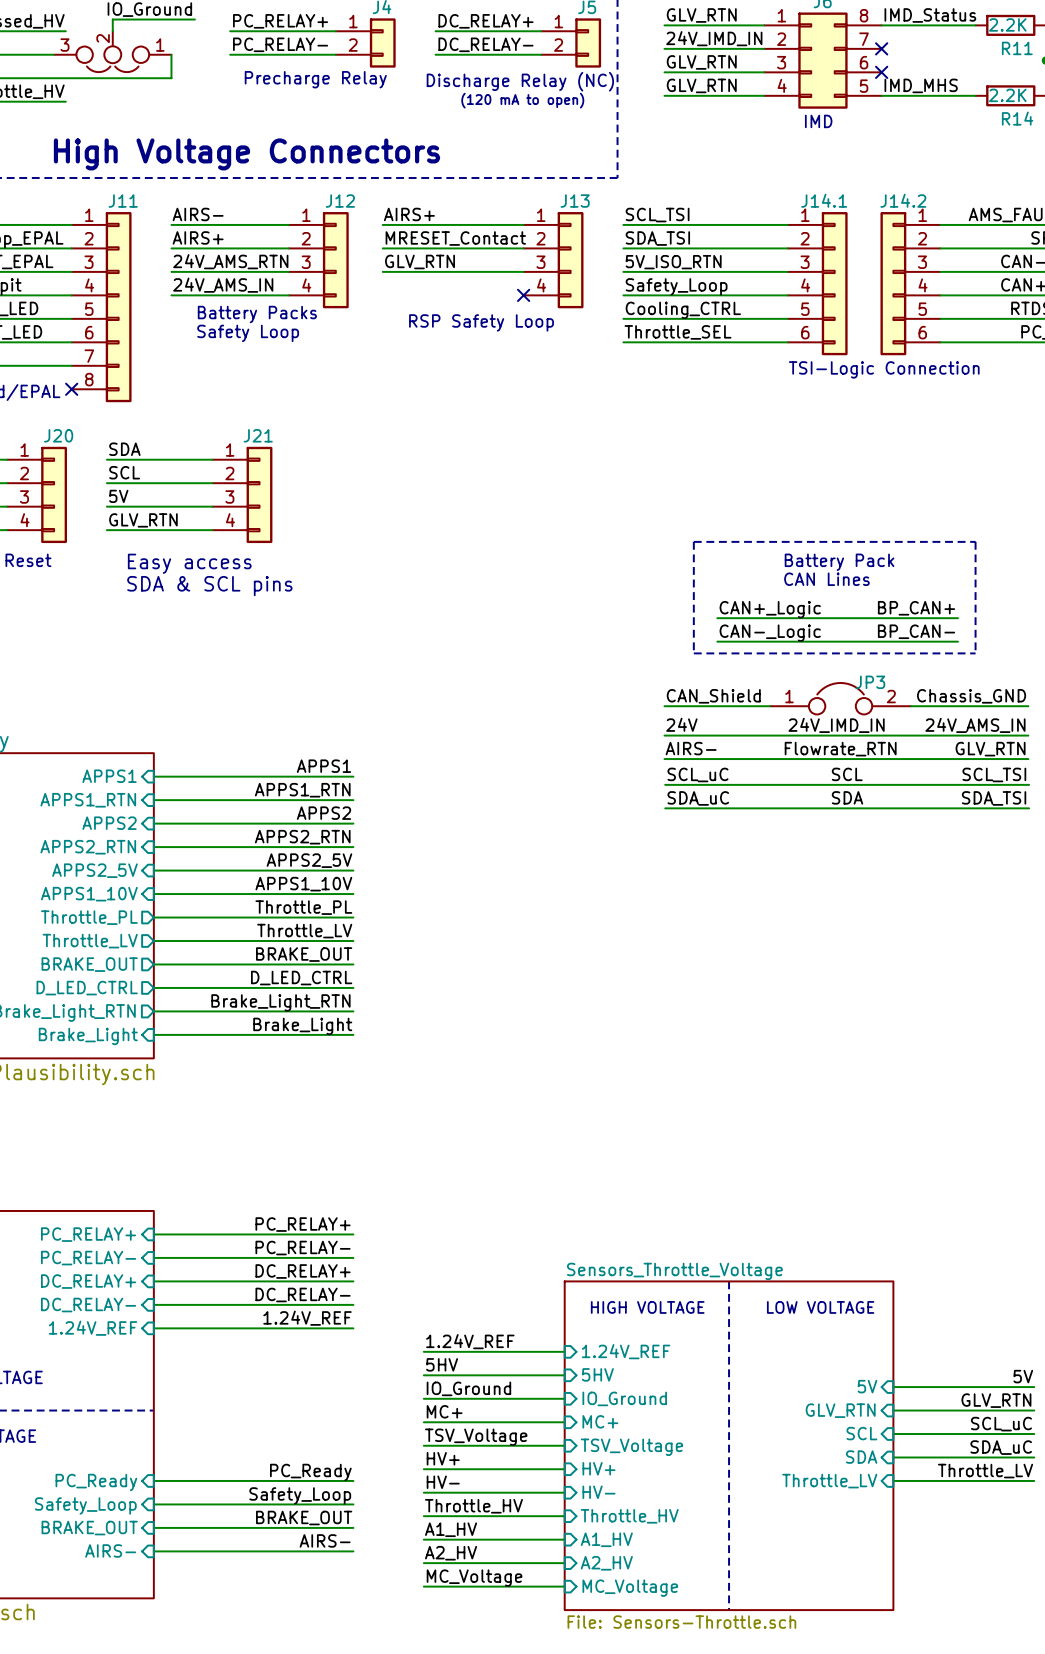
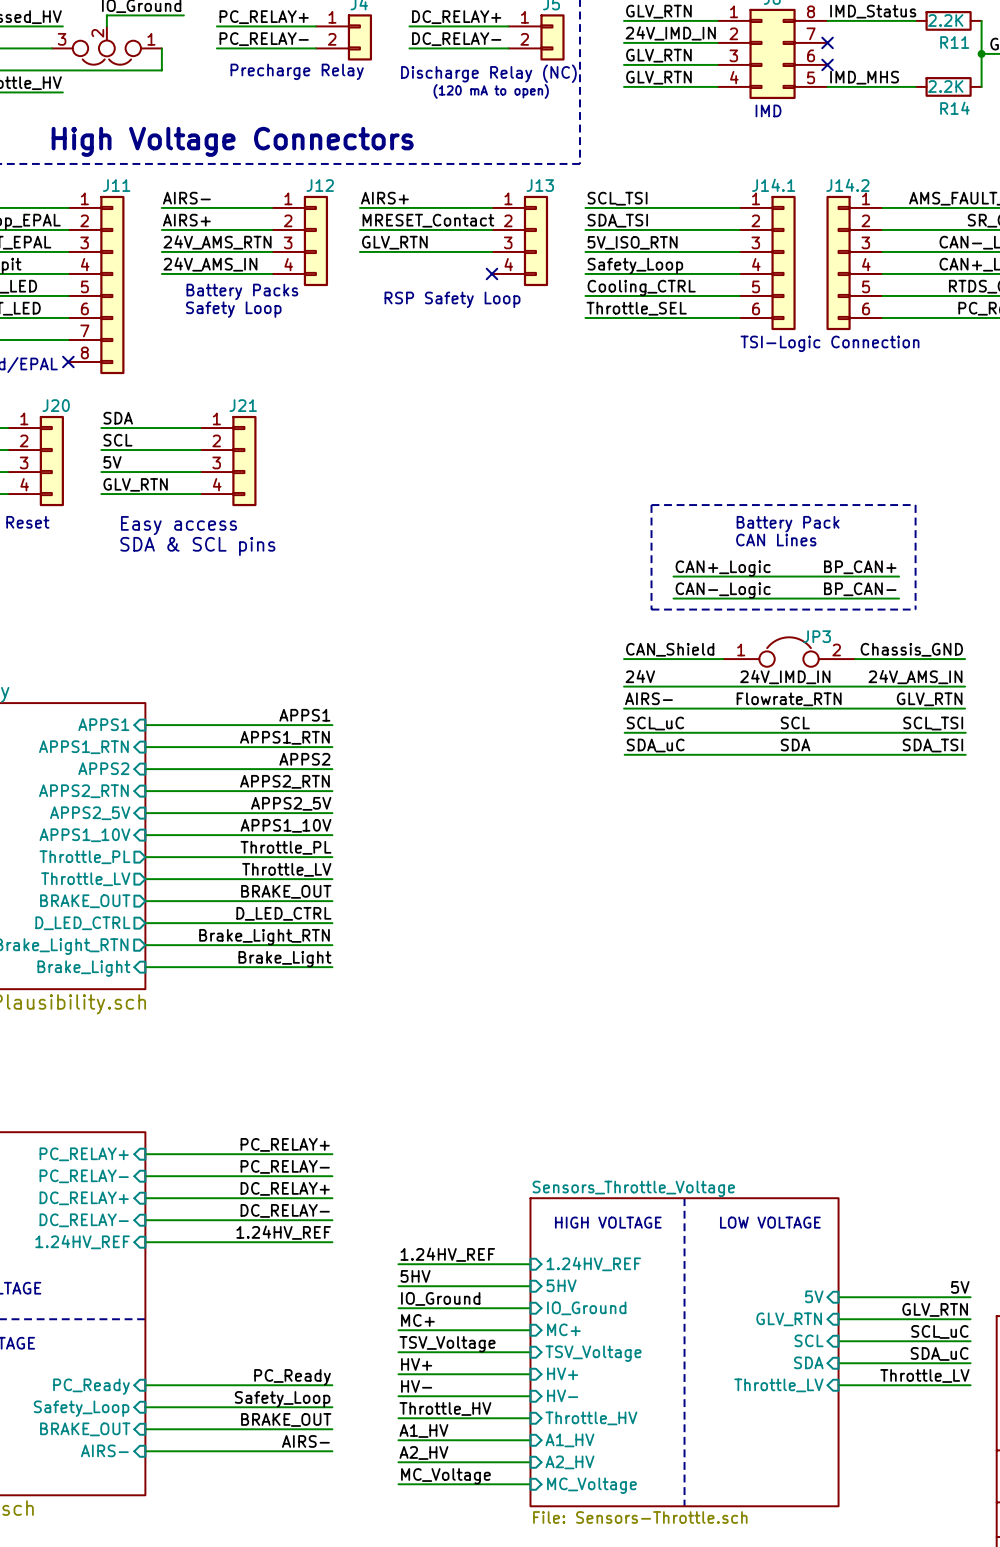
label: 1.24V_REF (307, 1318) -> 1.24HV_REF (283, 1232)
sheet pin: 1.24V_REF (93, 1328) -> 1.24HV_REF (82, 1242)
label: 1.24V_REF (470, 1341) -> 1.24HV_REF (447, 1254)
sheet pin: 1.24V_REF (626, 1351) -> 1.24HV_REF (593, 1264)

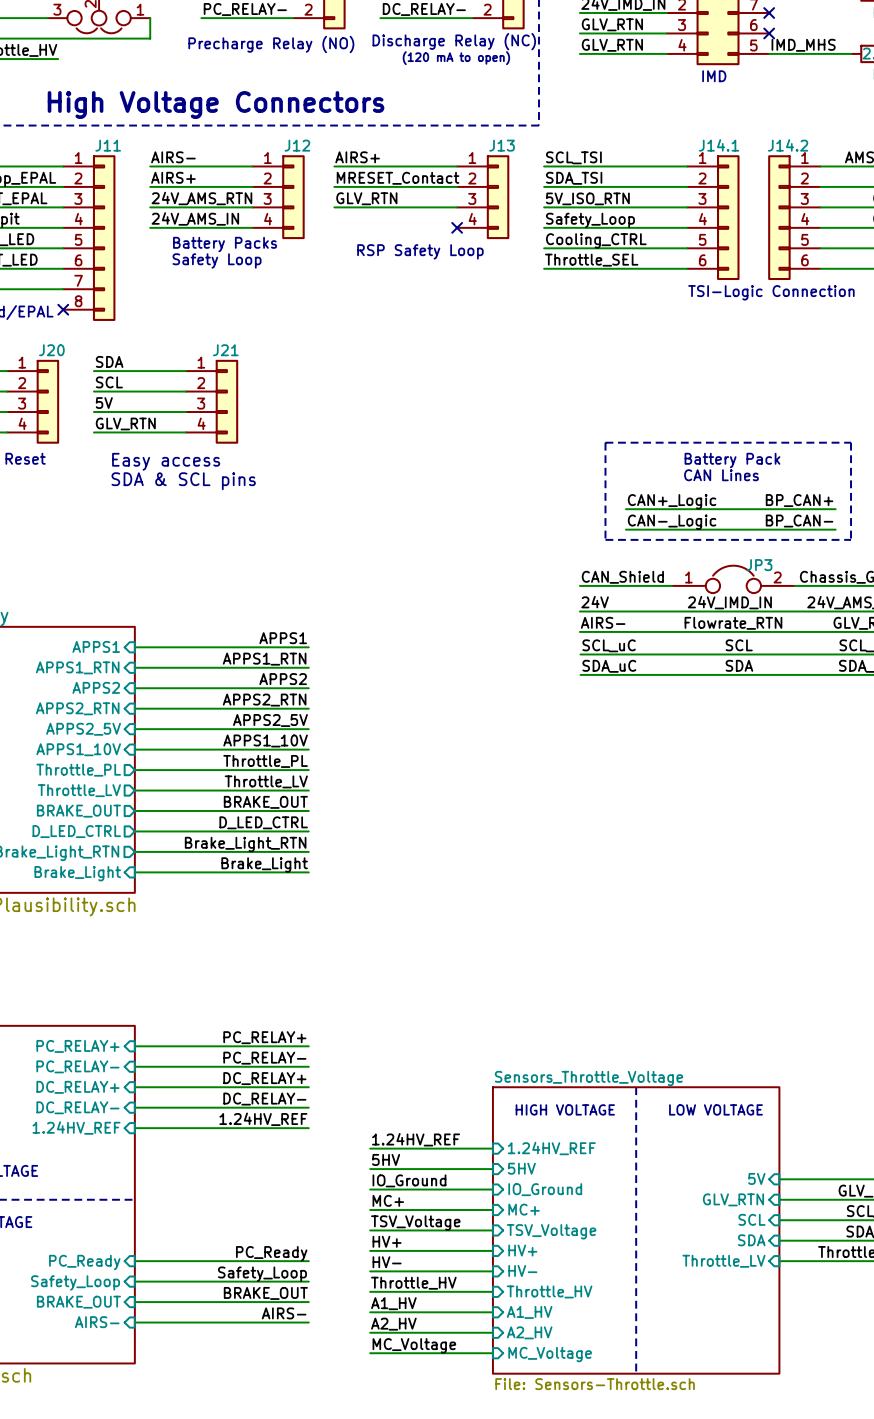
text: Precharge Relay (297, 71) -> Precharge Relay (NO) (271, 44)

